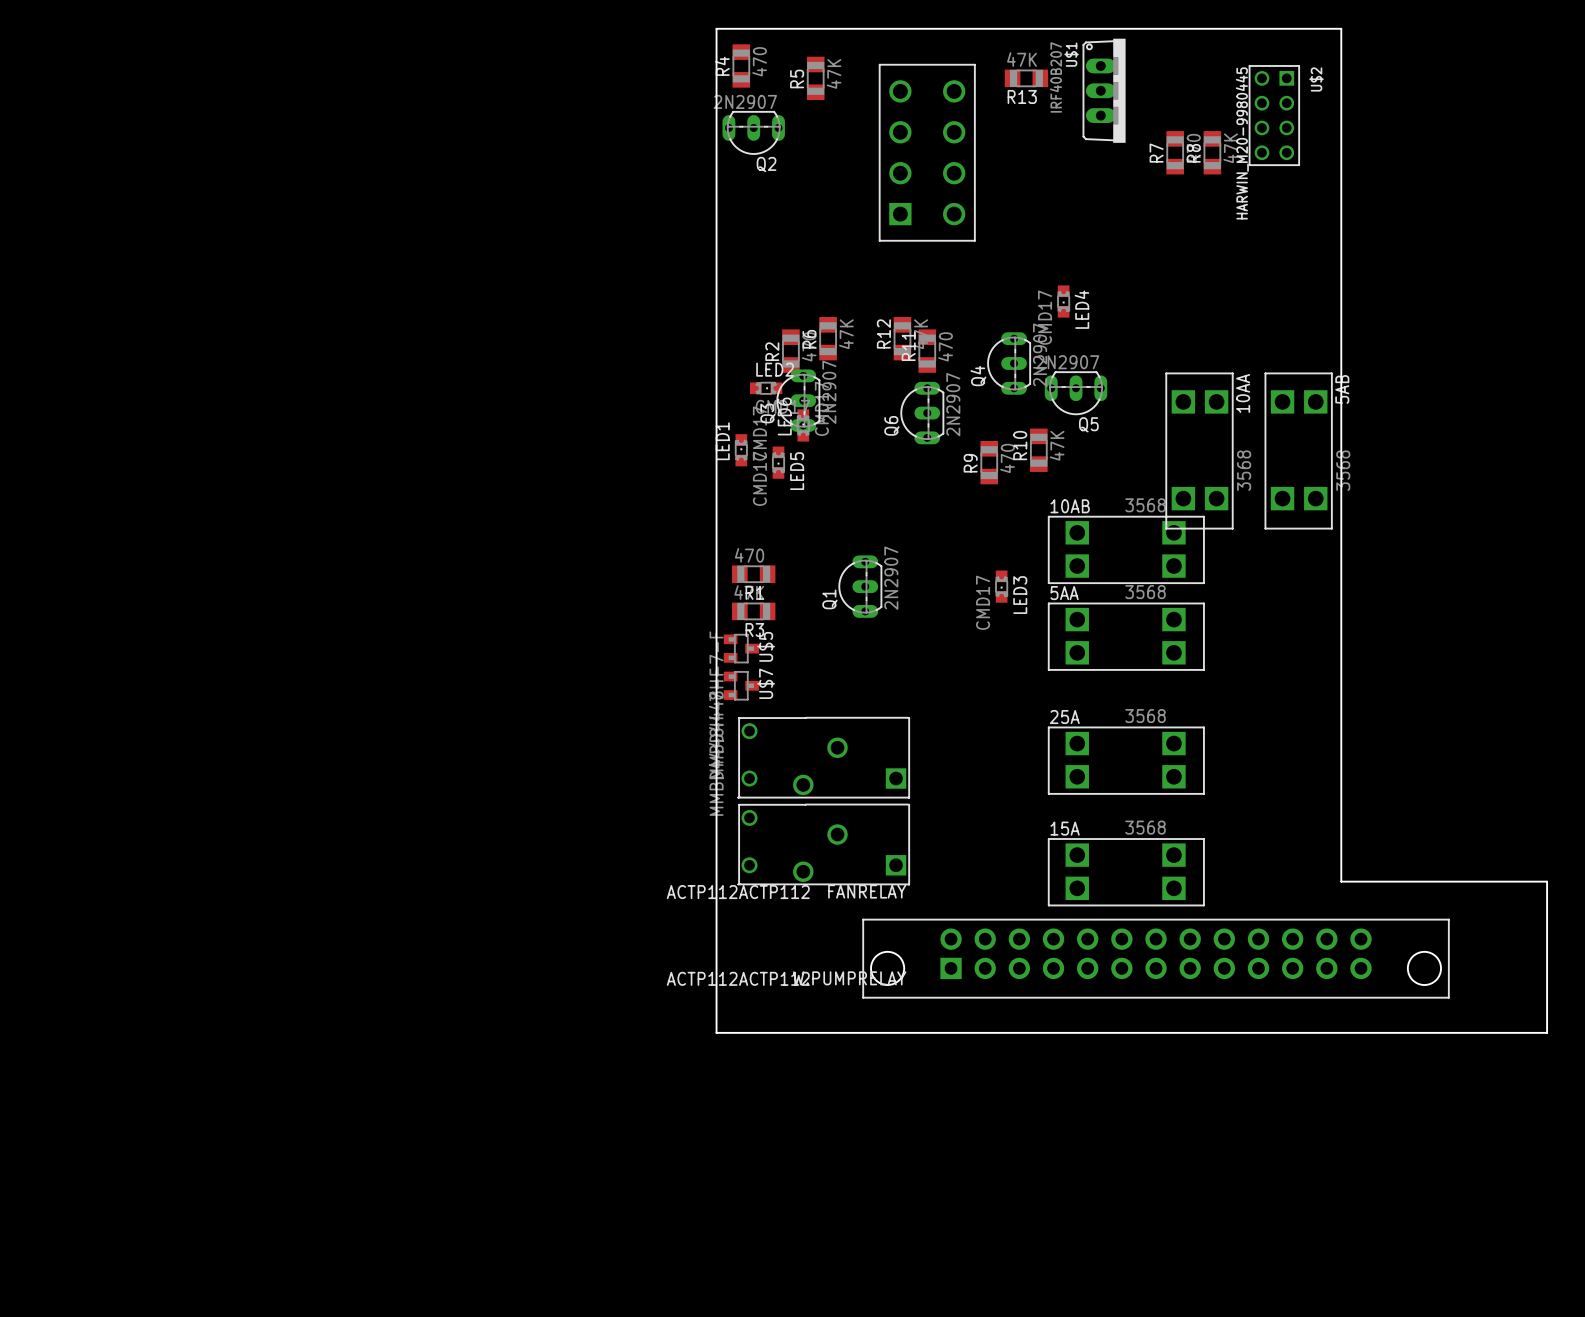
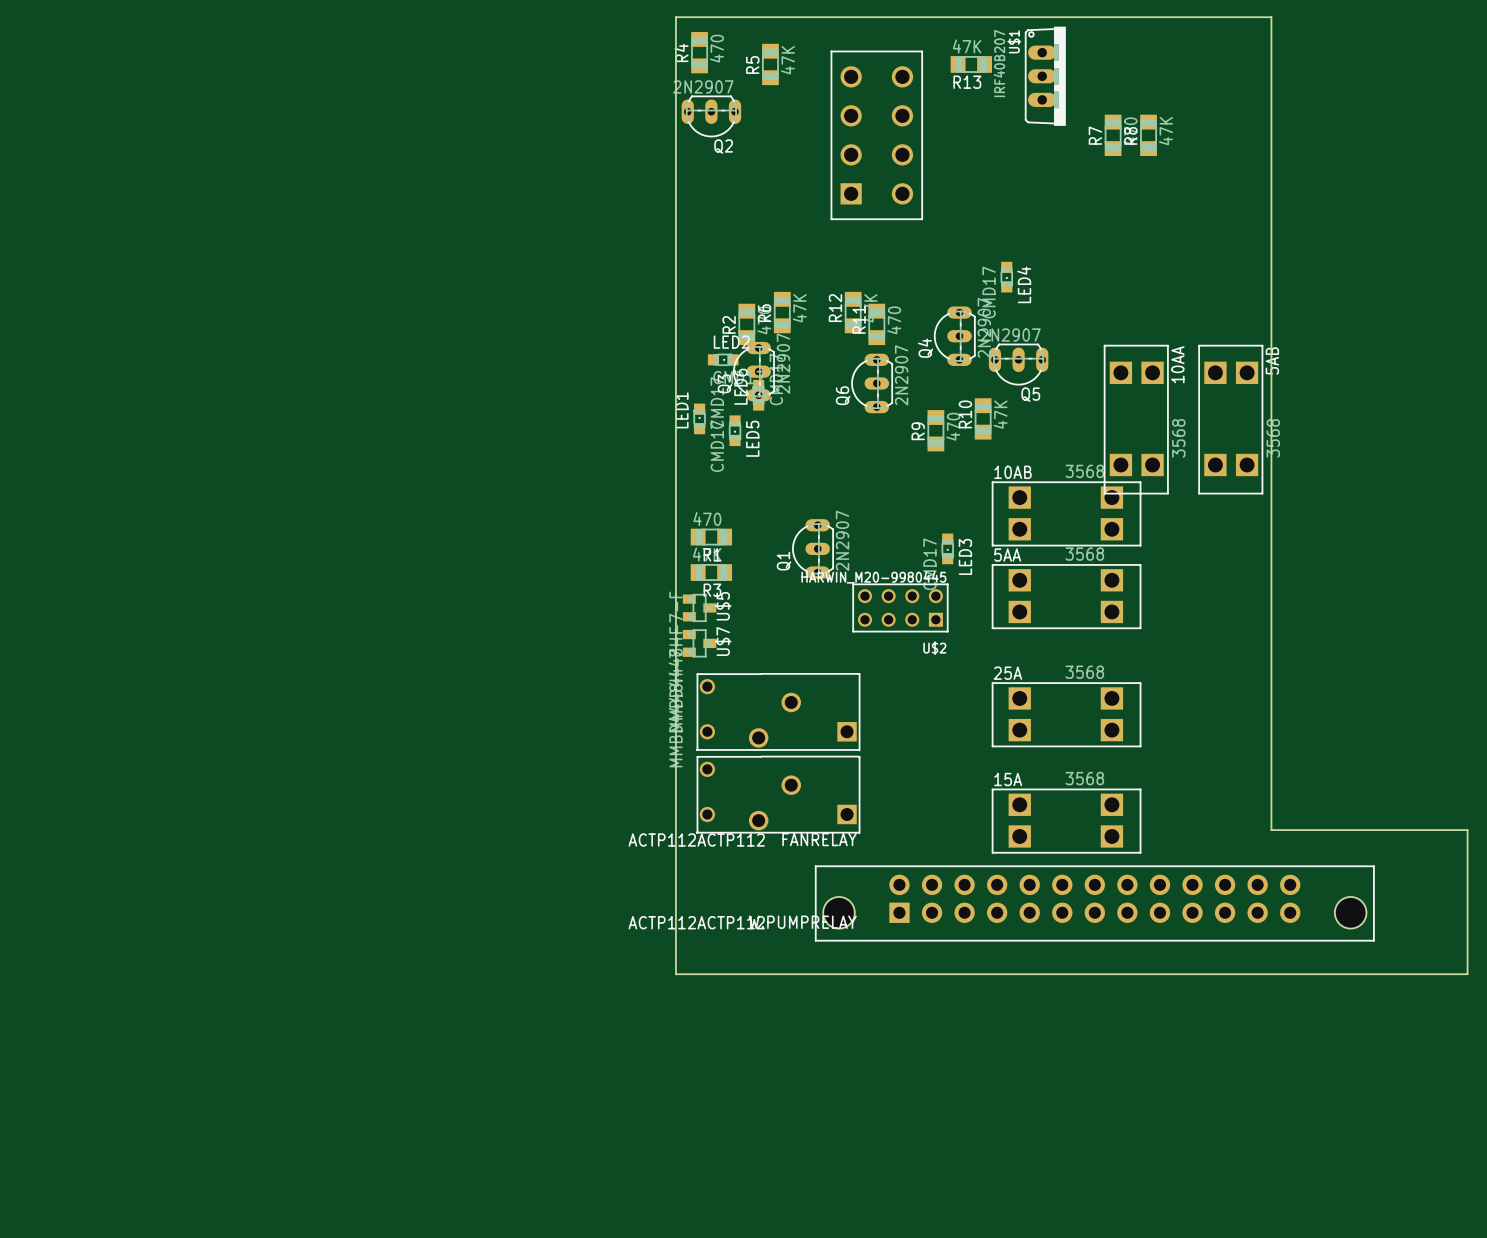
U$2 rotation: 0° (1274, 115) -> 90° clockwise (900, 607)
U$2 position: (1274, 115) -> (900, 607)

